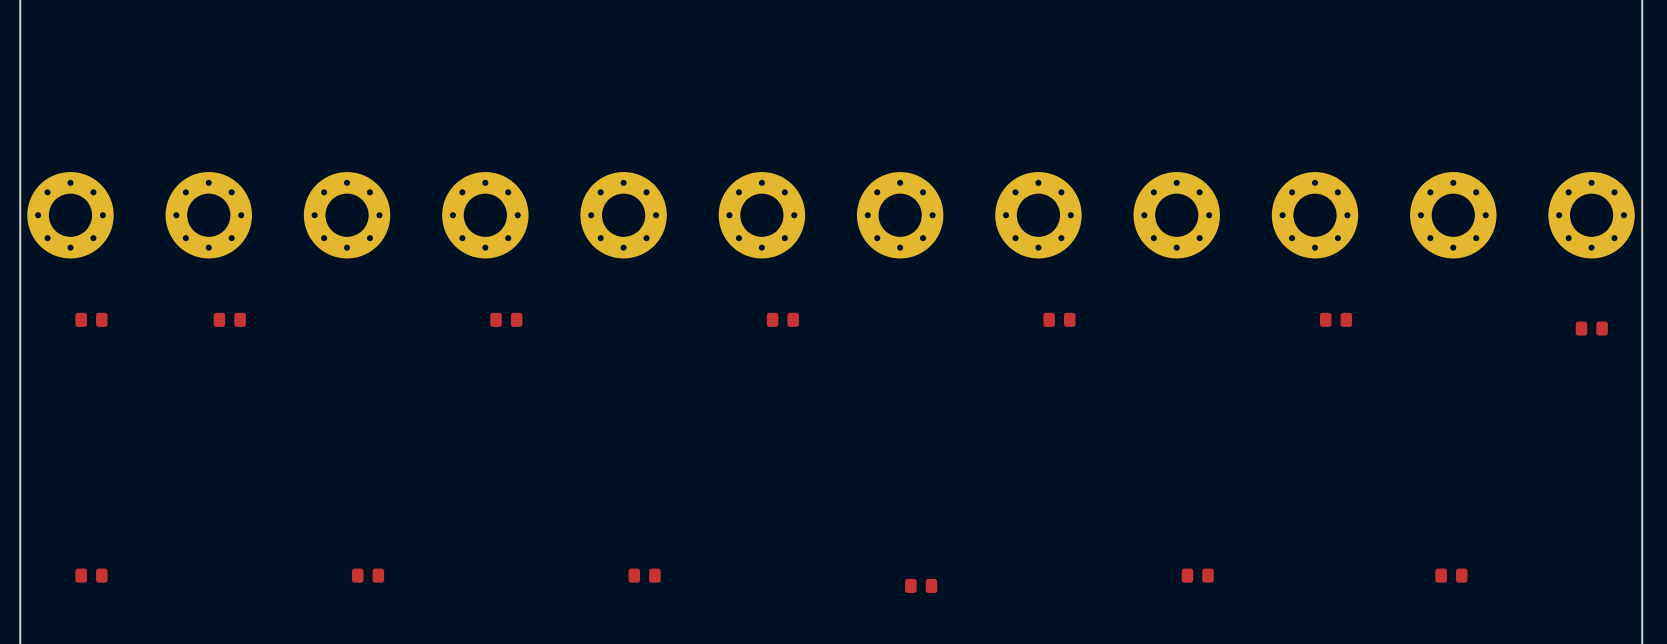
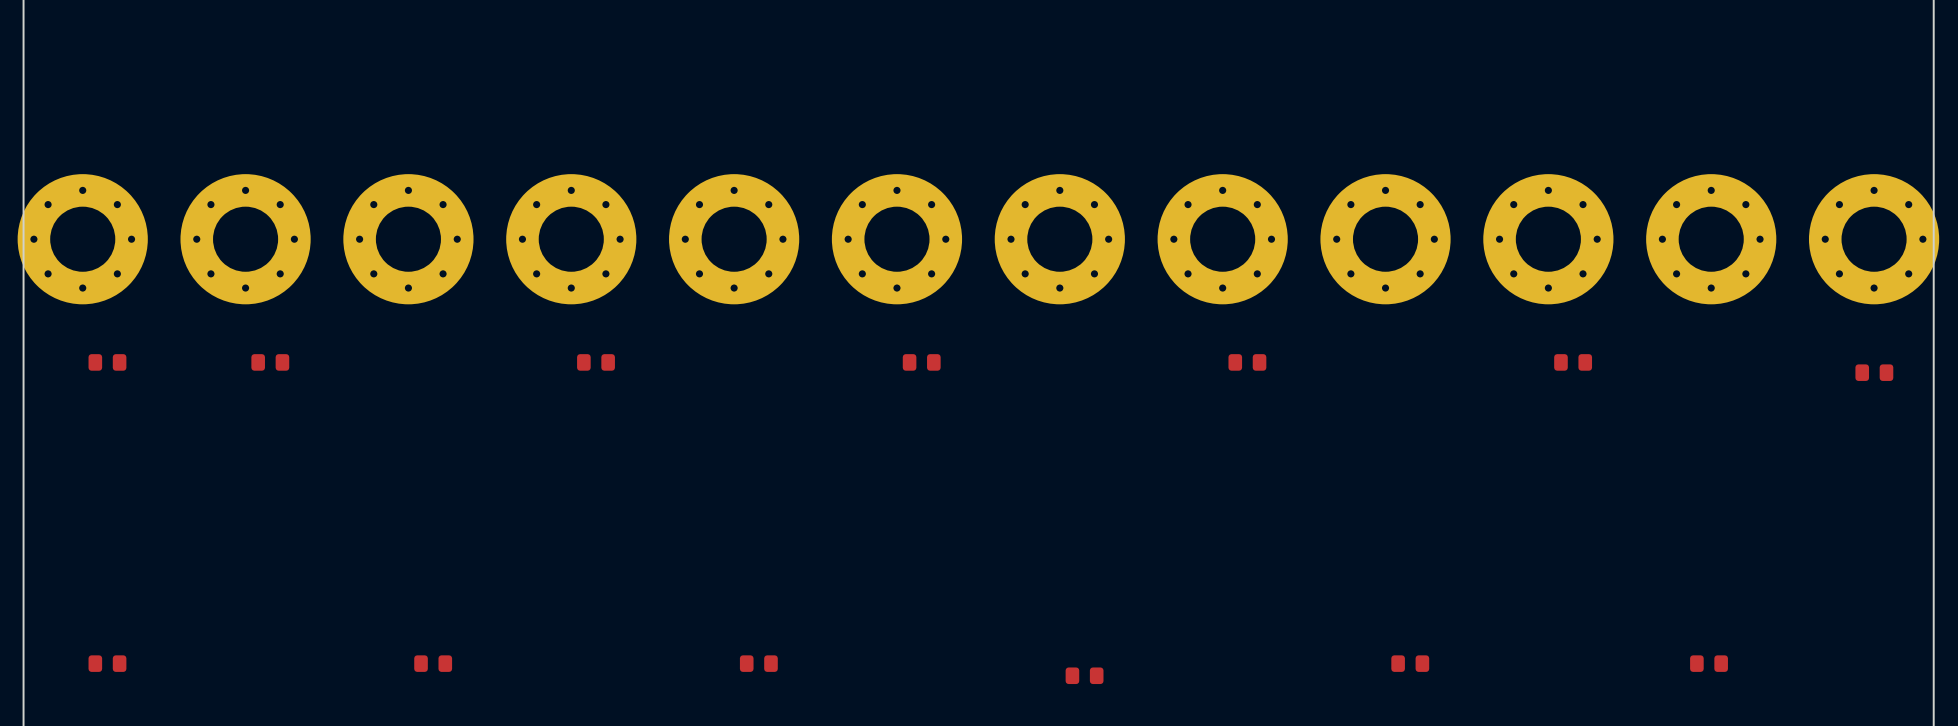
part footprint: [27, 172, 114, 259] -> [17, 174, 148, 305]
part footprint: [165, 172, 252, 259] -> [180, 174, 311, 305]
part footprint: [303, 172, 391, 259] -> [343, 174, 474, 305]
part footprint: [442, 172, 529, 259] -> [506, 174, 637, 305]
part footprint: [580, 172, 667, 259] -> [669, 174, 800, 305]
part footprint: [718, 172, 806, 259] -> [831, 174, 963, 305]
part footprint: [856, 172, 944, 259] -> [994, 174, 1125, 305]
part footprint: [995, 172, 1082, 259] -> [1157, 174, 1288, 305]
part footprint: [1133, 172, 1220, 259] -> [1320, 174, 1451, 305]
part footprint: [1271, 172, 1359, 259] -> [1483, 174, 1614, 305]
part footprint: [1410, 172, 1497, 259] -> [1646, 174, 1777, 305]
part footprint: [1548, 172, 1635, 259] -> [1808, 174, 1940, 305]

